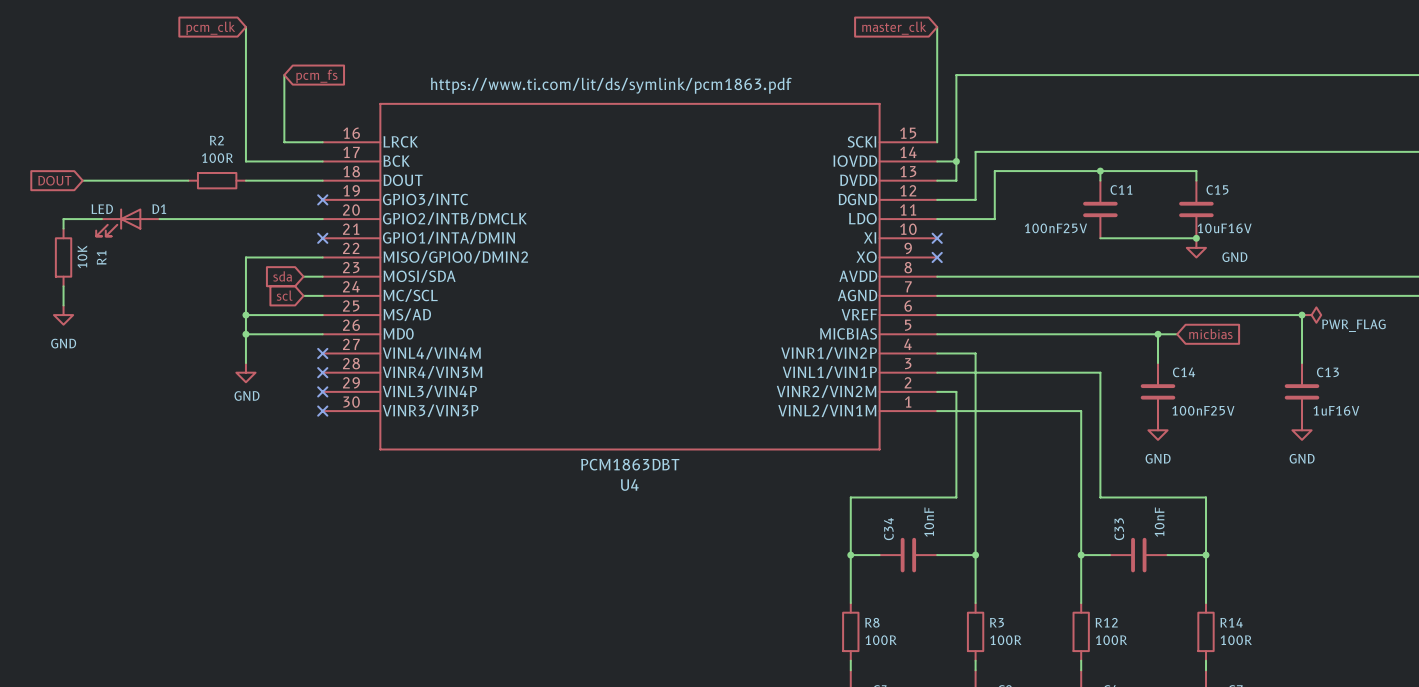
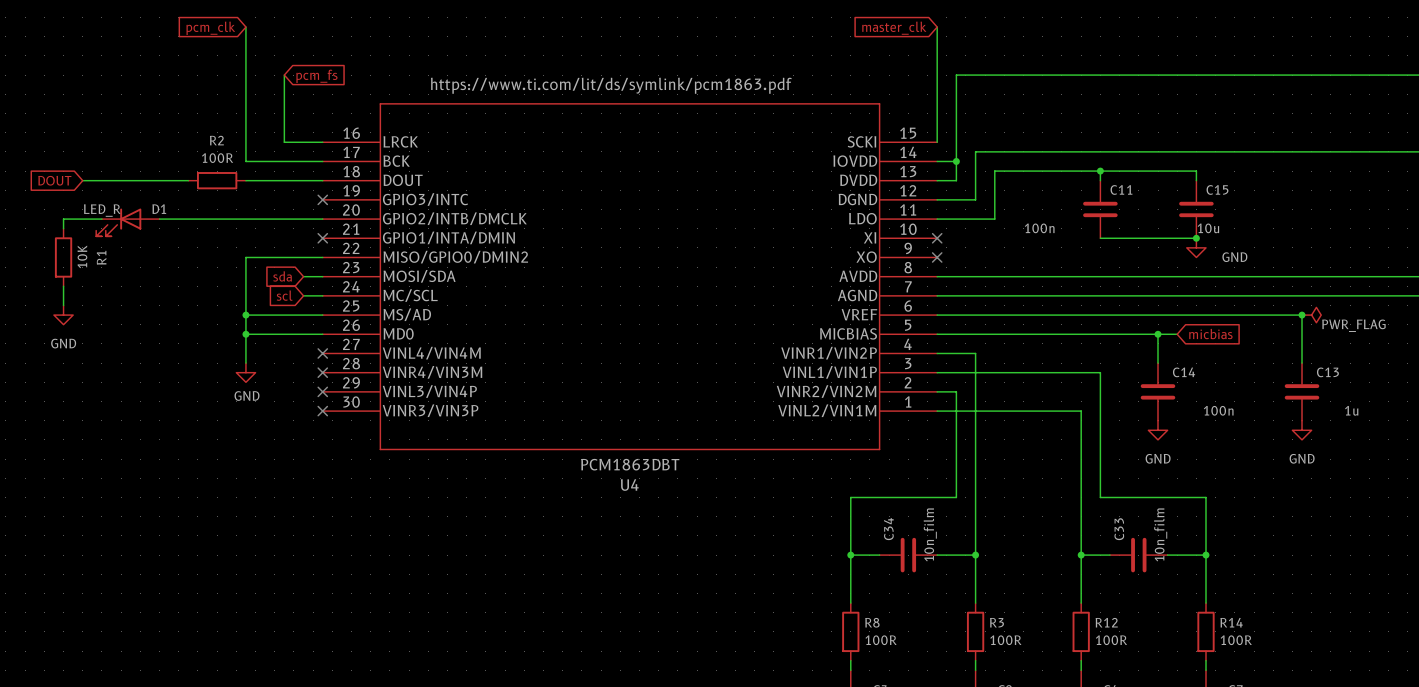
D1 value: LED (102, 209) -> LED_R (102, 210)
C11 value: 100nF25V (1055, 228) -> 100n (1039, 228)
C15 value: 10uF16V (1224, 228) -> 10u (1208, 228)
C14 value: 100nF25V (1203, 410) -> 100n (1218, 410)
C13 value: 1uF16V (1336, 410) -> 1u (1351, 410)
C34 value: 10nF (929, 522) -> 10n_film (930, 534)
C33 value: 10nF (1159, 522) -> 10n_film (1160, 534)

